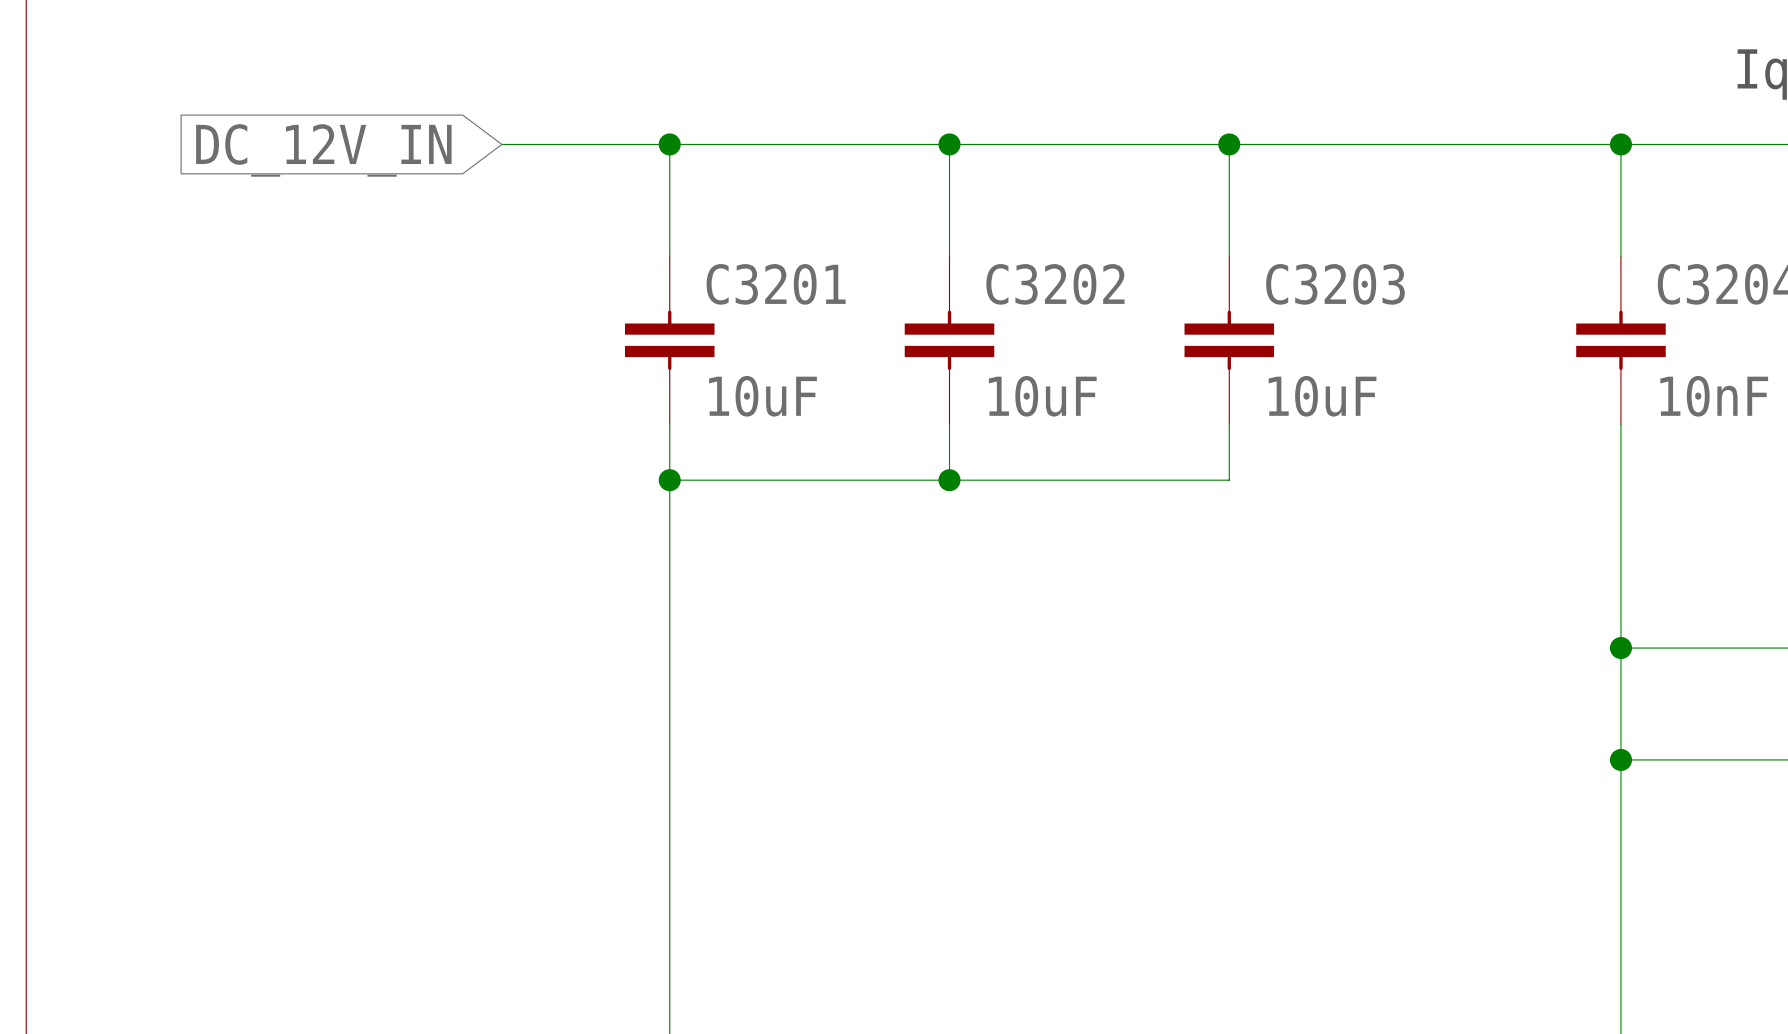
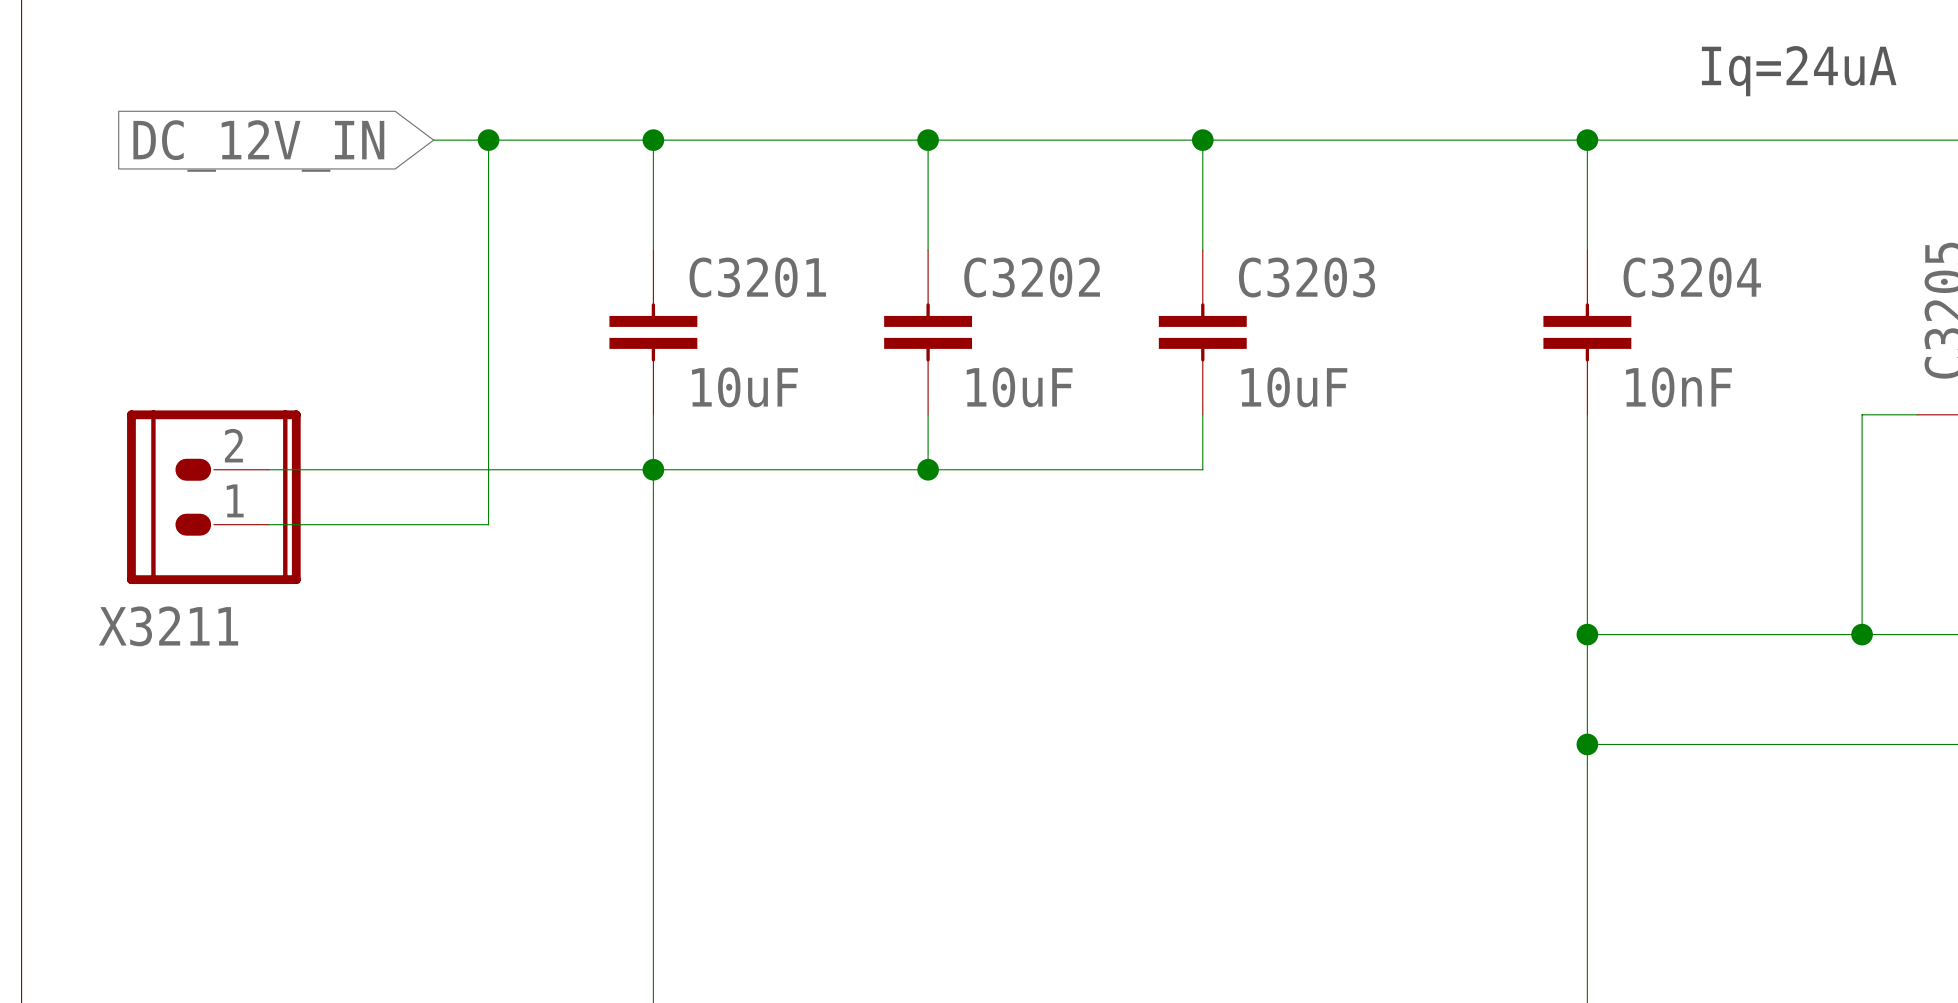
wire: none -> (433, 140) (488, 140) (488, 524) (268, 524)
junction: none -> (488, 140)
global label position: DC_12V_IN (323, 150) -> DC_12V_IN (258, 145)
wire: none -> (268, 469) (653, 469)
X3211: none -> (213, 497)

